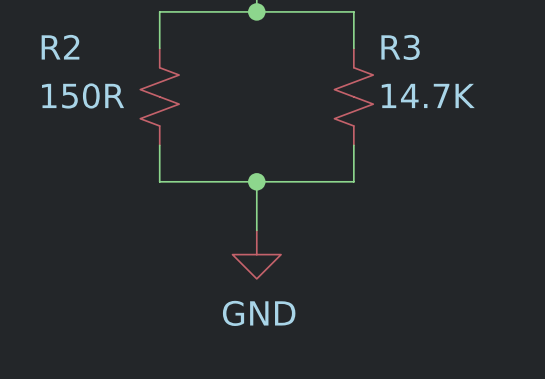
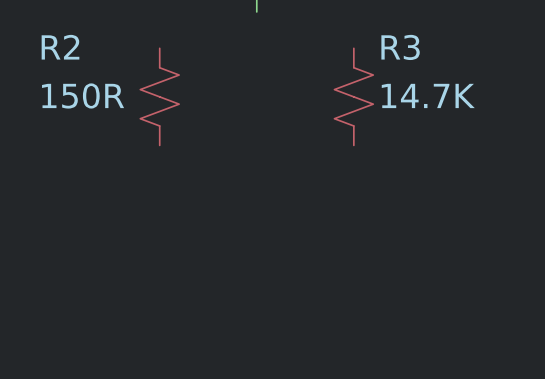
junction: (256, 11) -> none
wire: (159, 48) (159, 11) (353, 11) (353, 48) -> none
wire: (159, 145) (159, 181) (353, 181) (353, 145) -> none
wire: (256, 181) (256, 230) -> none
junction: (256, 181) -> none
power symbol: GND (256, 254) -> none

